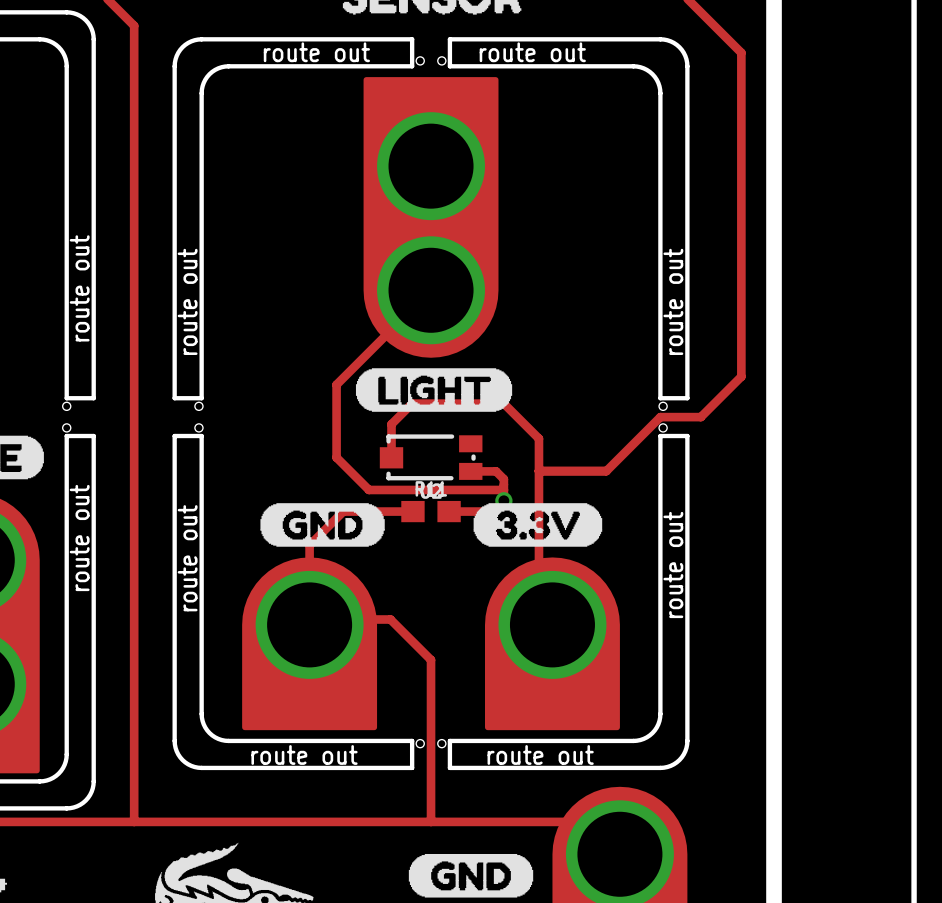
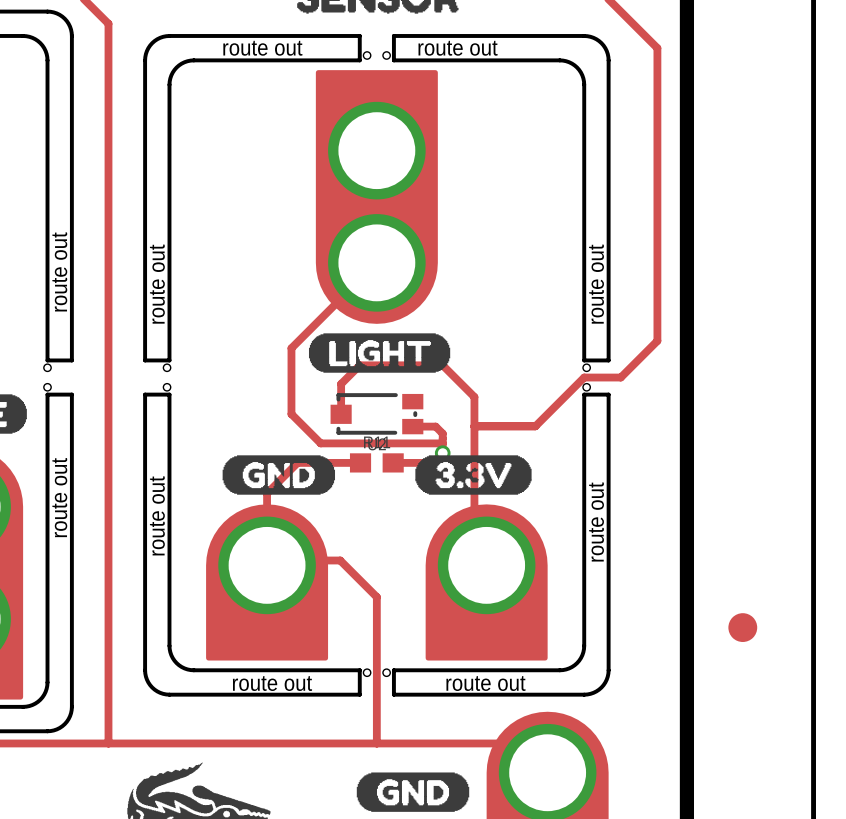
part: none -> (742, 627)

